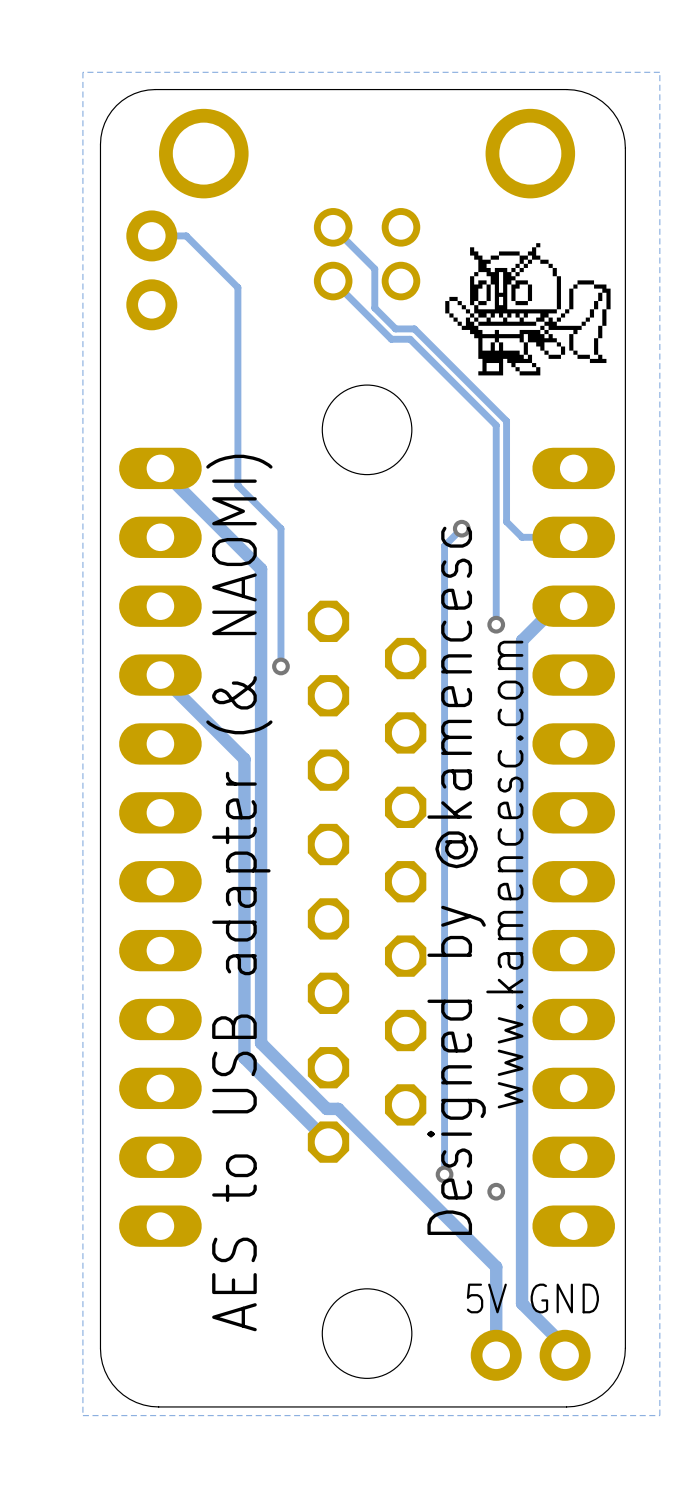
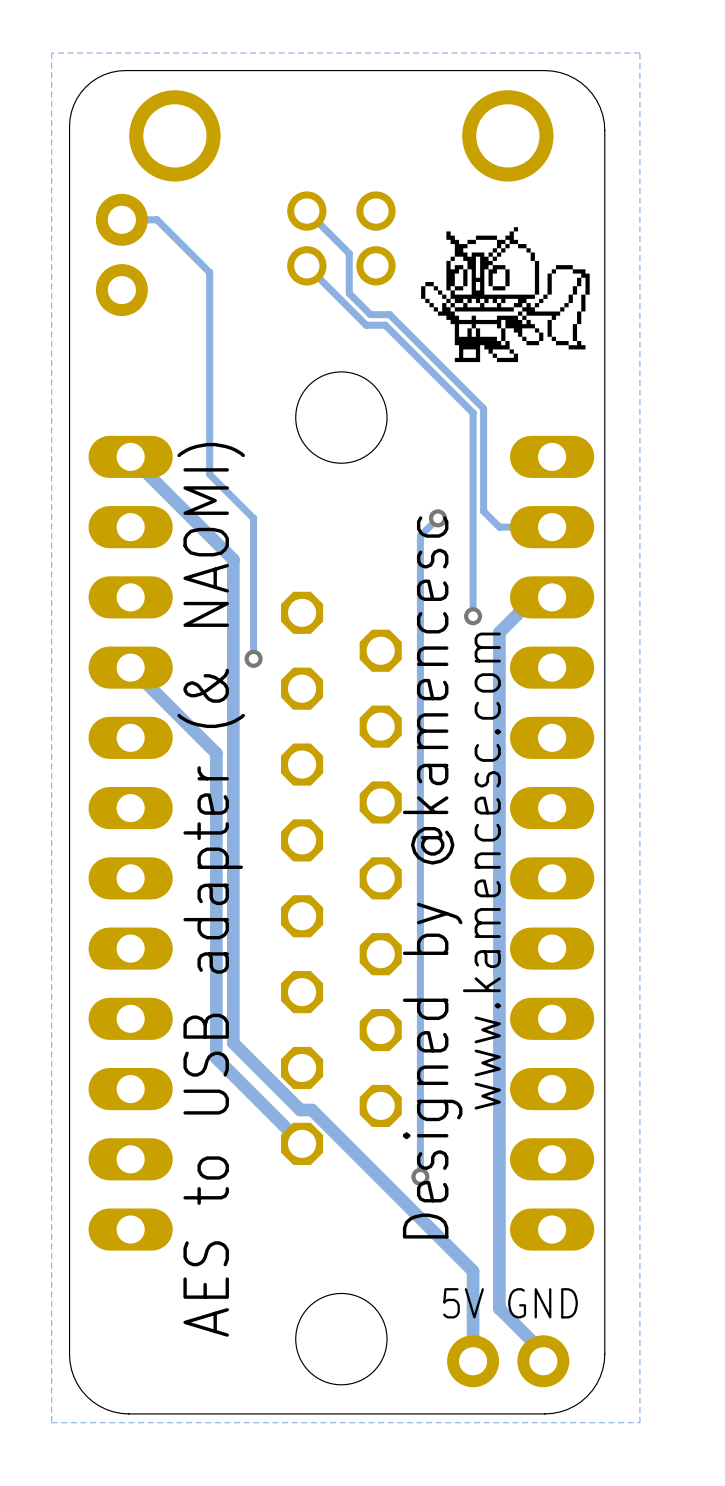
via: (496, 1191) -> none

